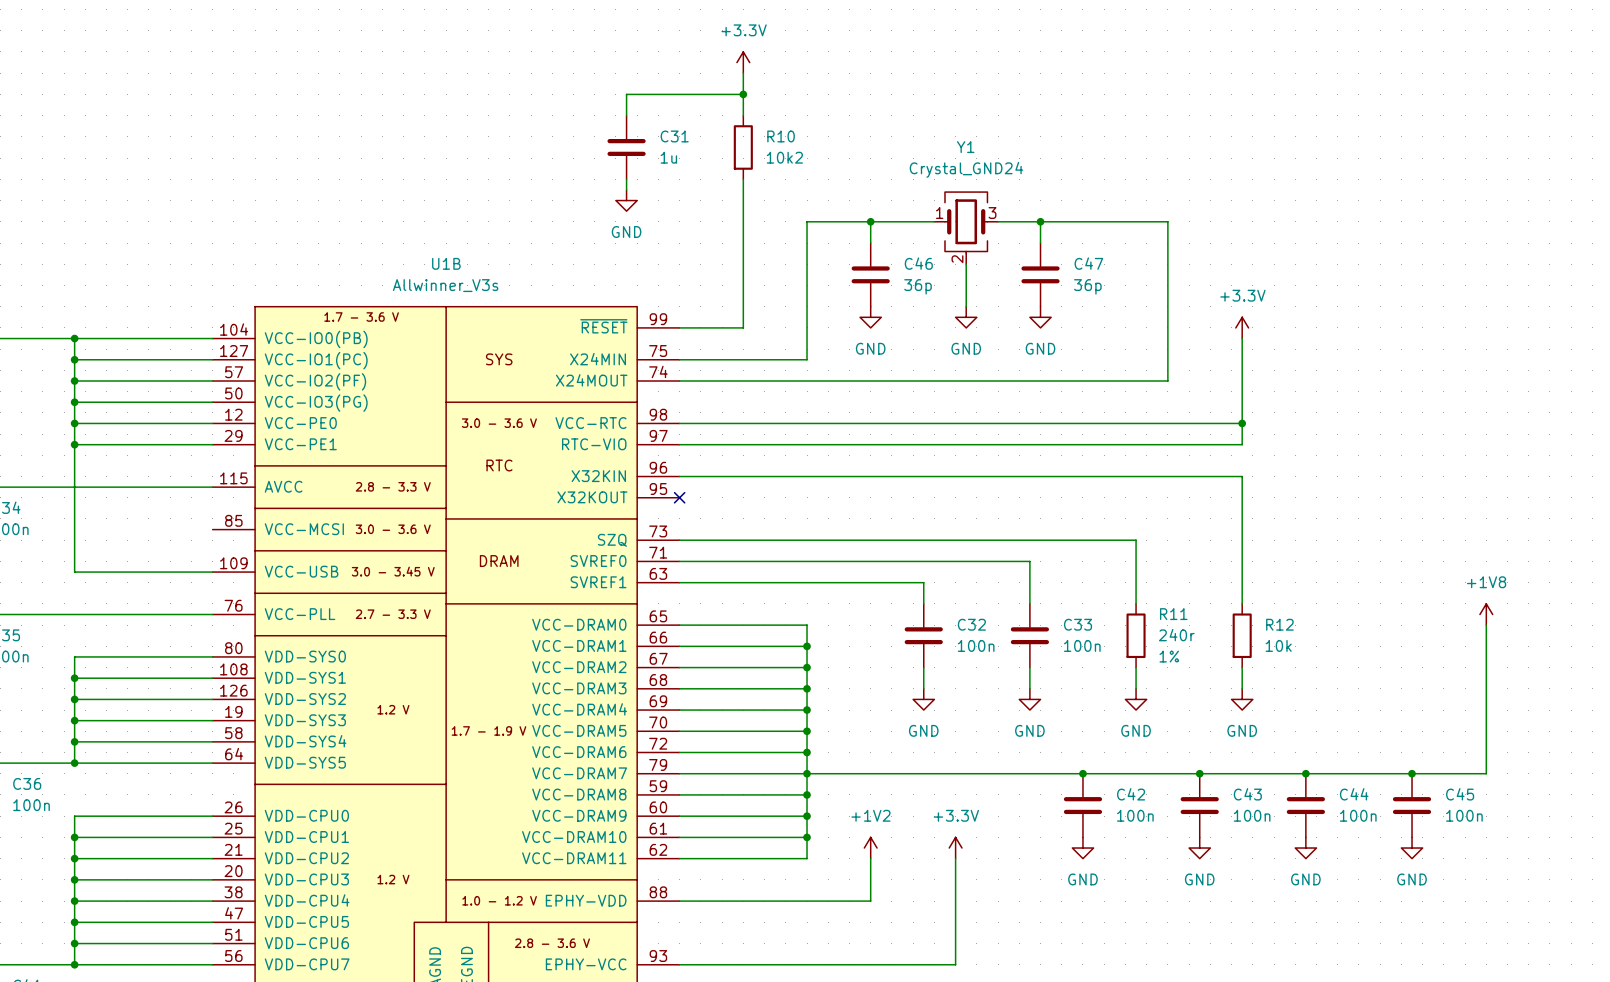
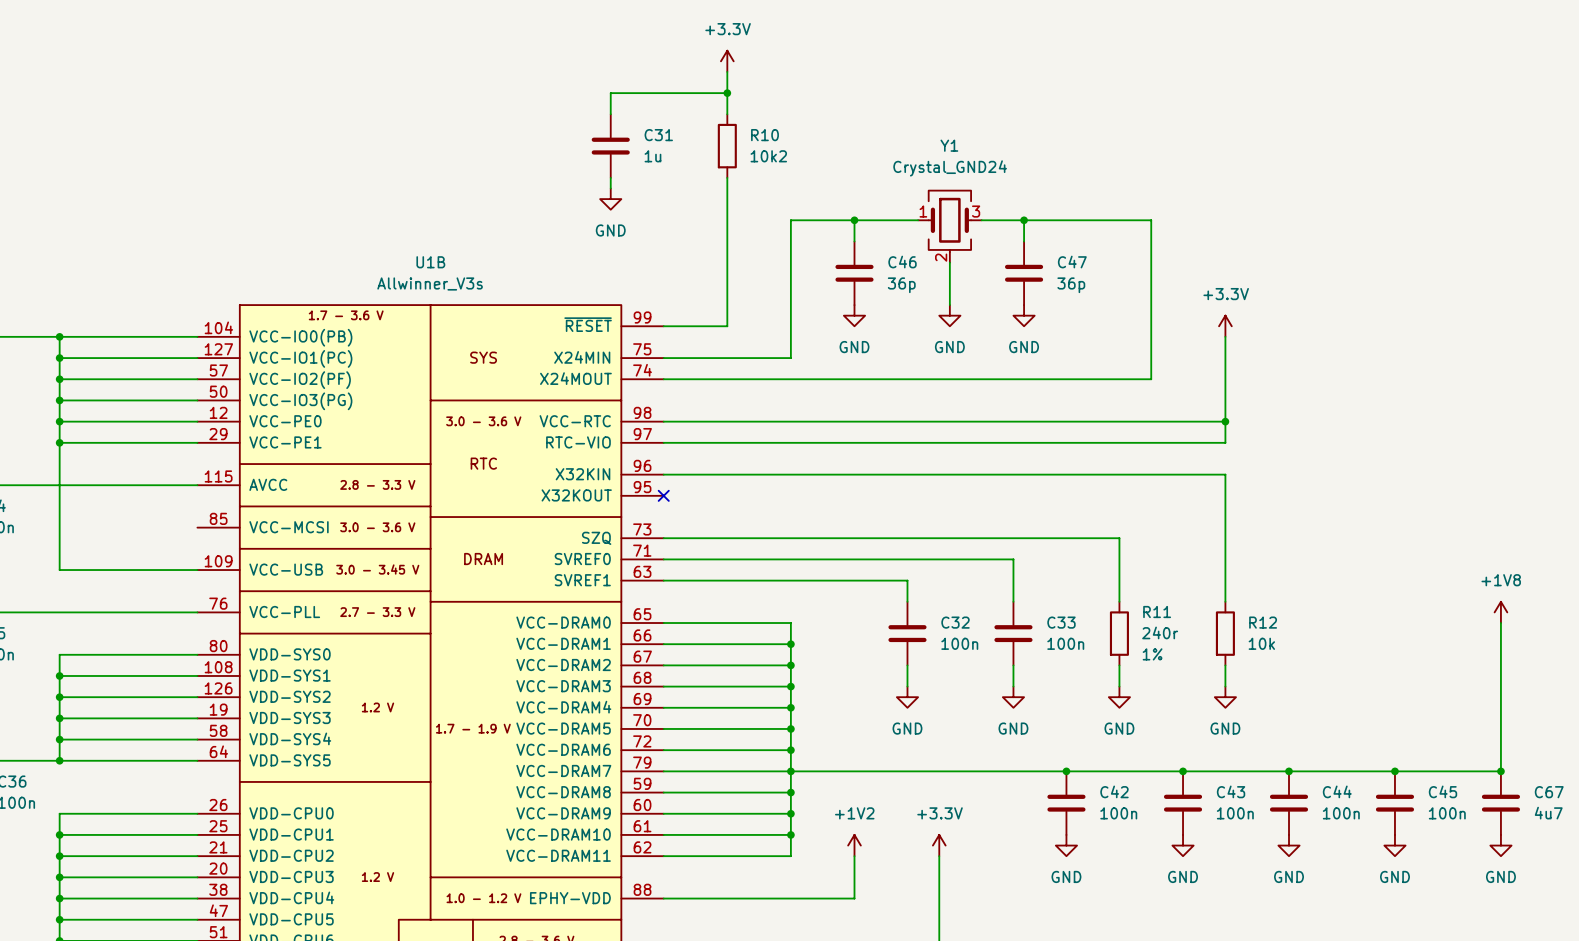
power symbol position: +1V8 (1486, 614) -> +1V8 (1500, 612)
wire: (1486, 625) (1486, 773) -> (1500, 623) (1500, 771) (1469, 771)
junction: none -> (1500, 771)
C67: none -> 4u7 (1500, 803)
power symbol: none -> GND (1500, 845)

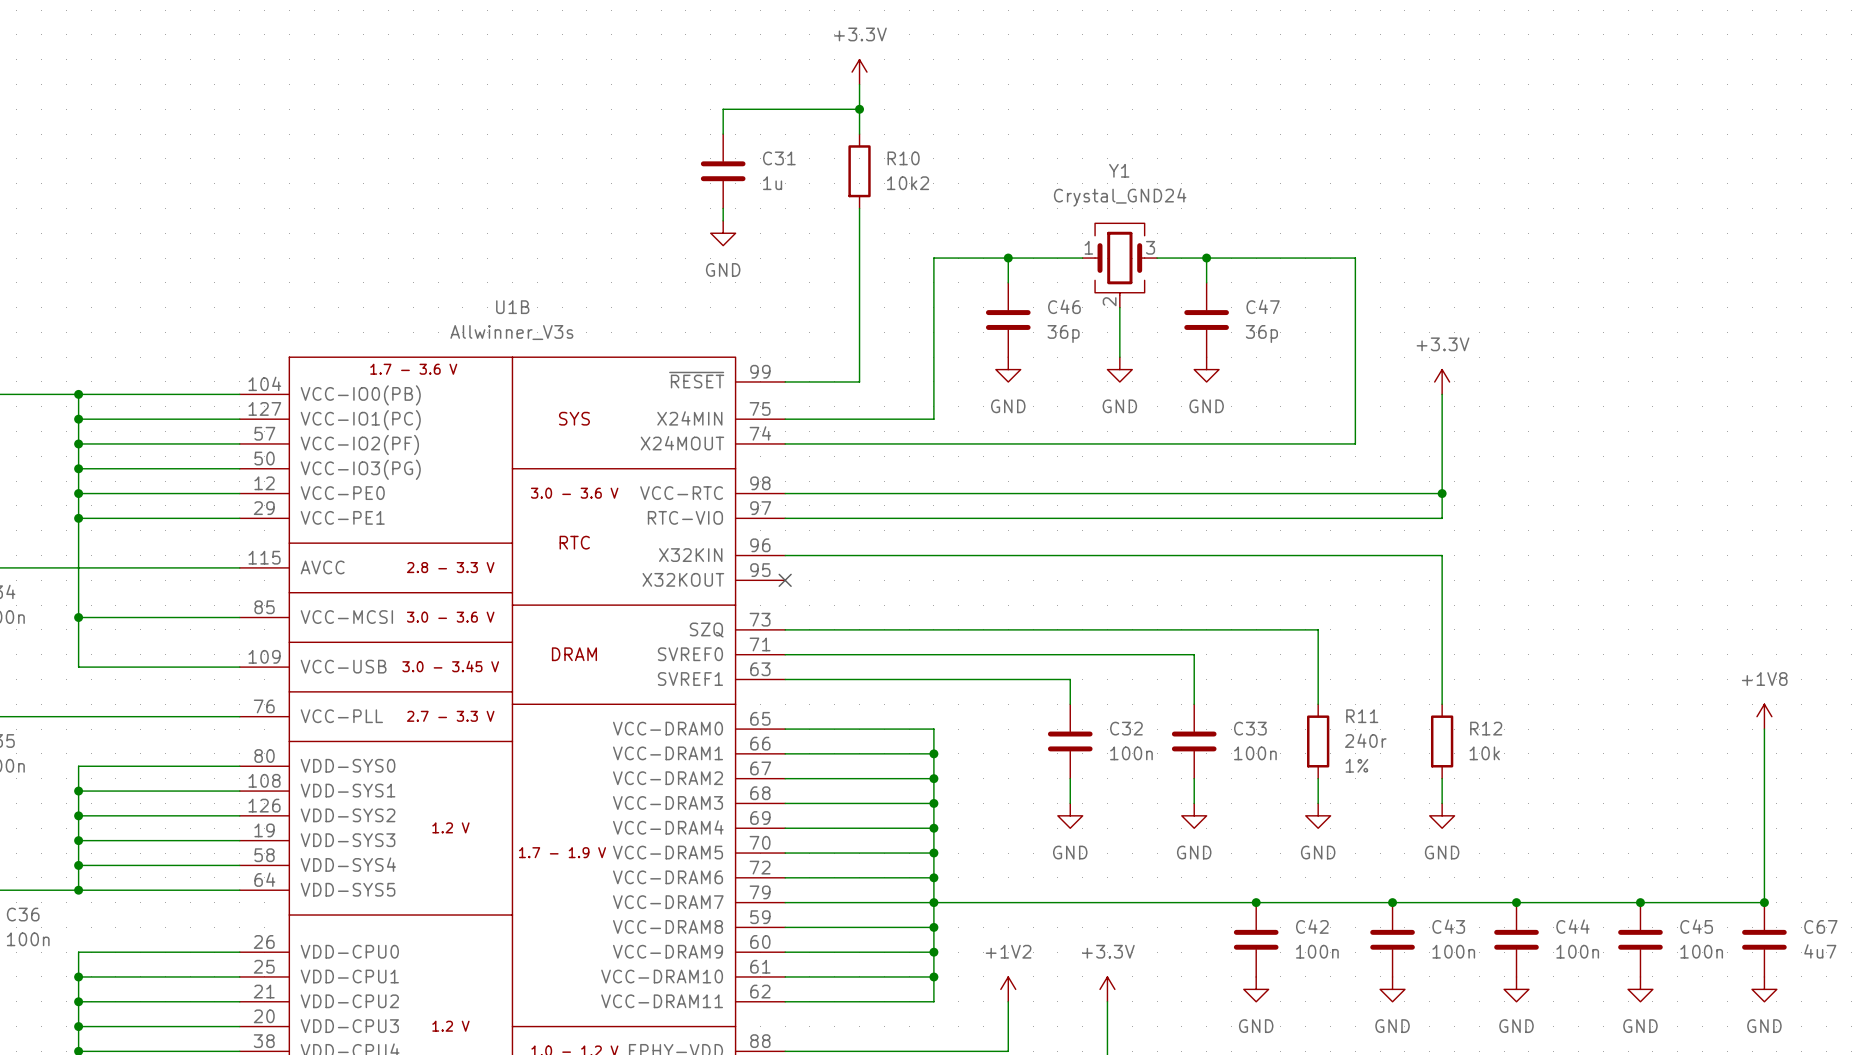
wire: none -> (78, 617) (239, 617)
junction: none -> (78, 617)

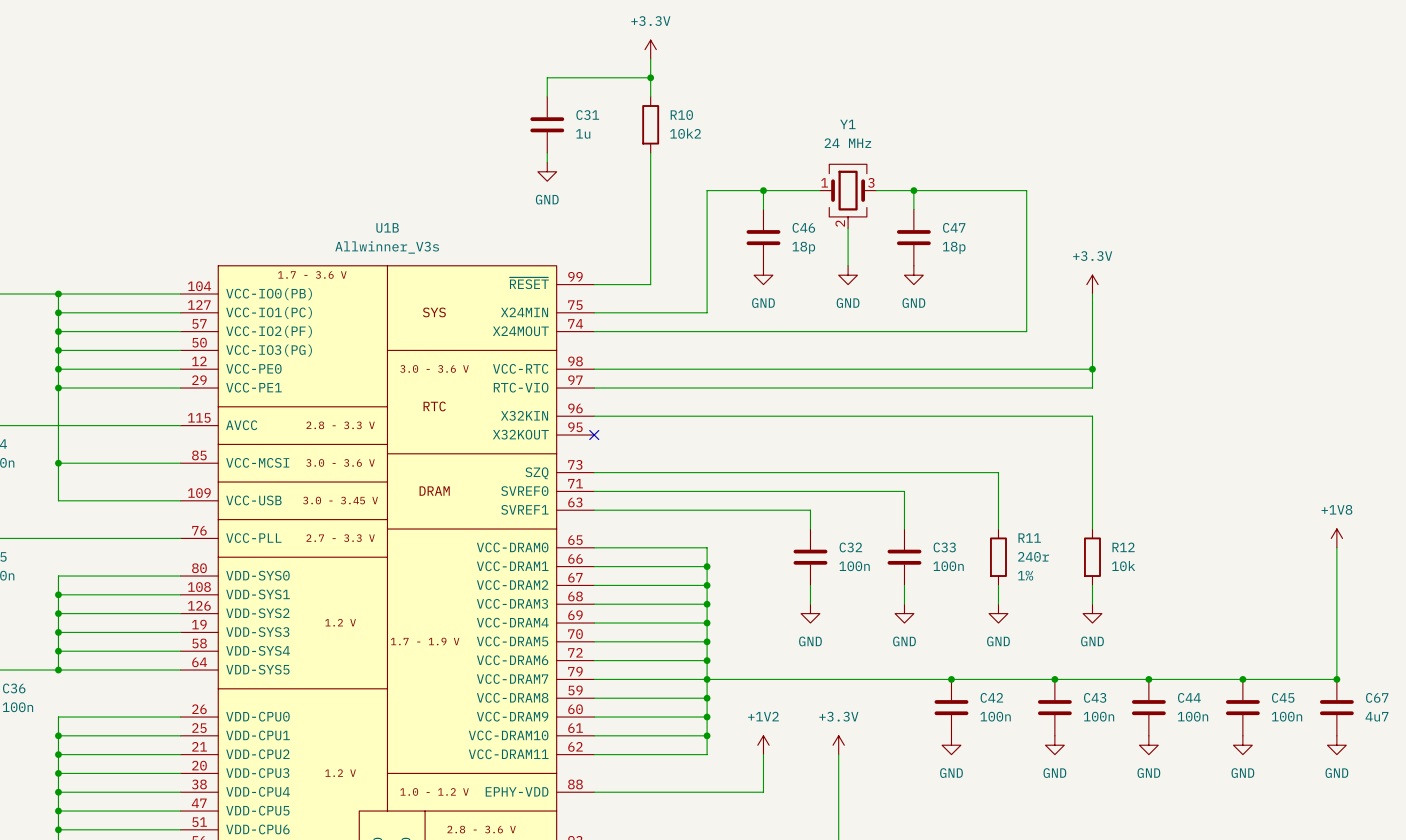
Y1 value: Crystal_GND24 (1120, 197) -> 24 MHz (847, 143)
C46 value: 36p (1063, 334) -> 18p (803, 247)
C47 value: 36p (1261, 334) -> 18p (954, 247)

